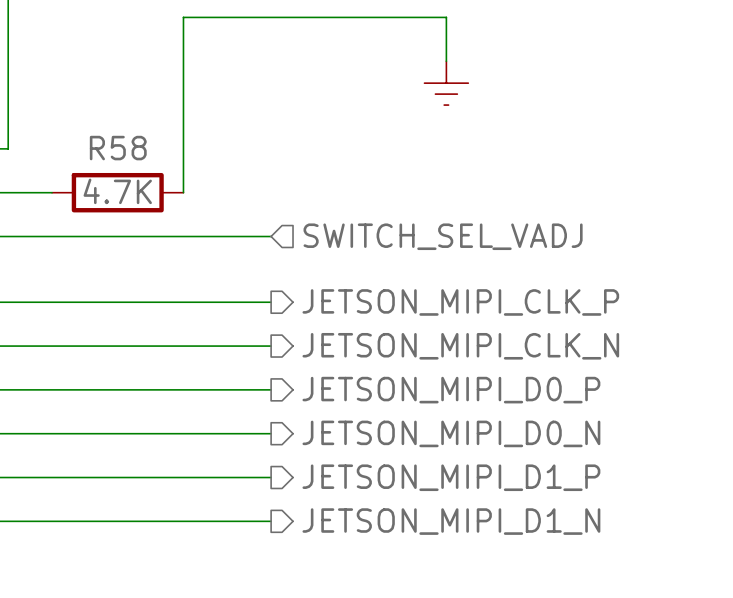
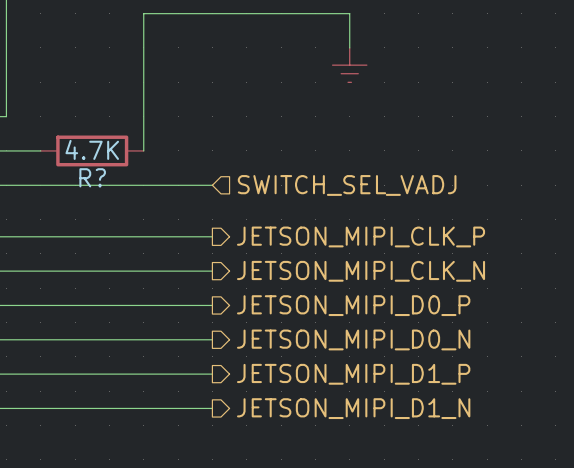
R58 name: R58 (118, 148) -> R? (92, 177)

